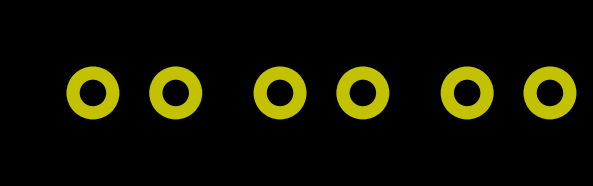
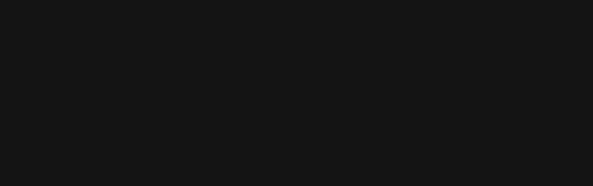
part: (134, 92) -> none
part: (321, 92) -> none
part: (508, 92) -> none

